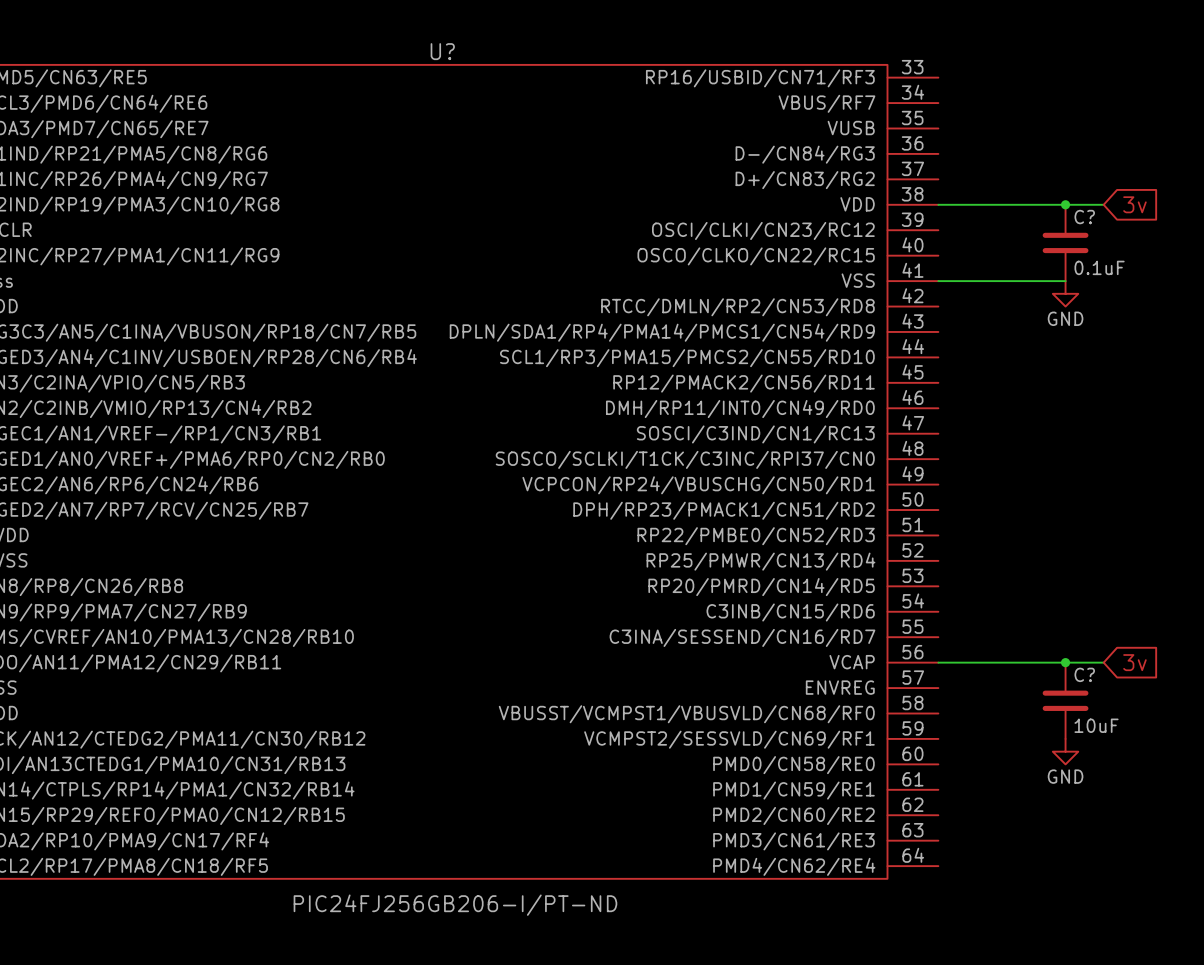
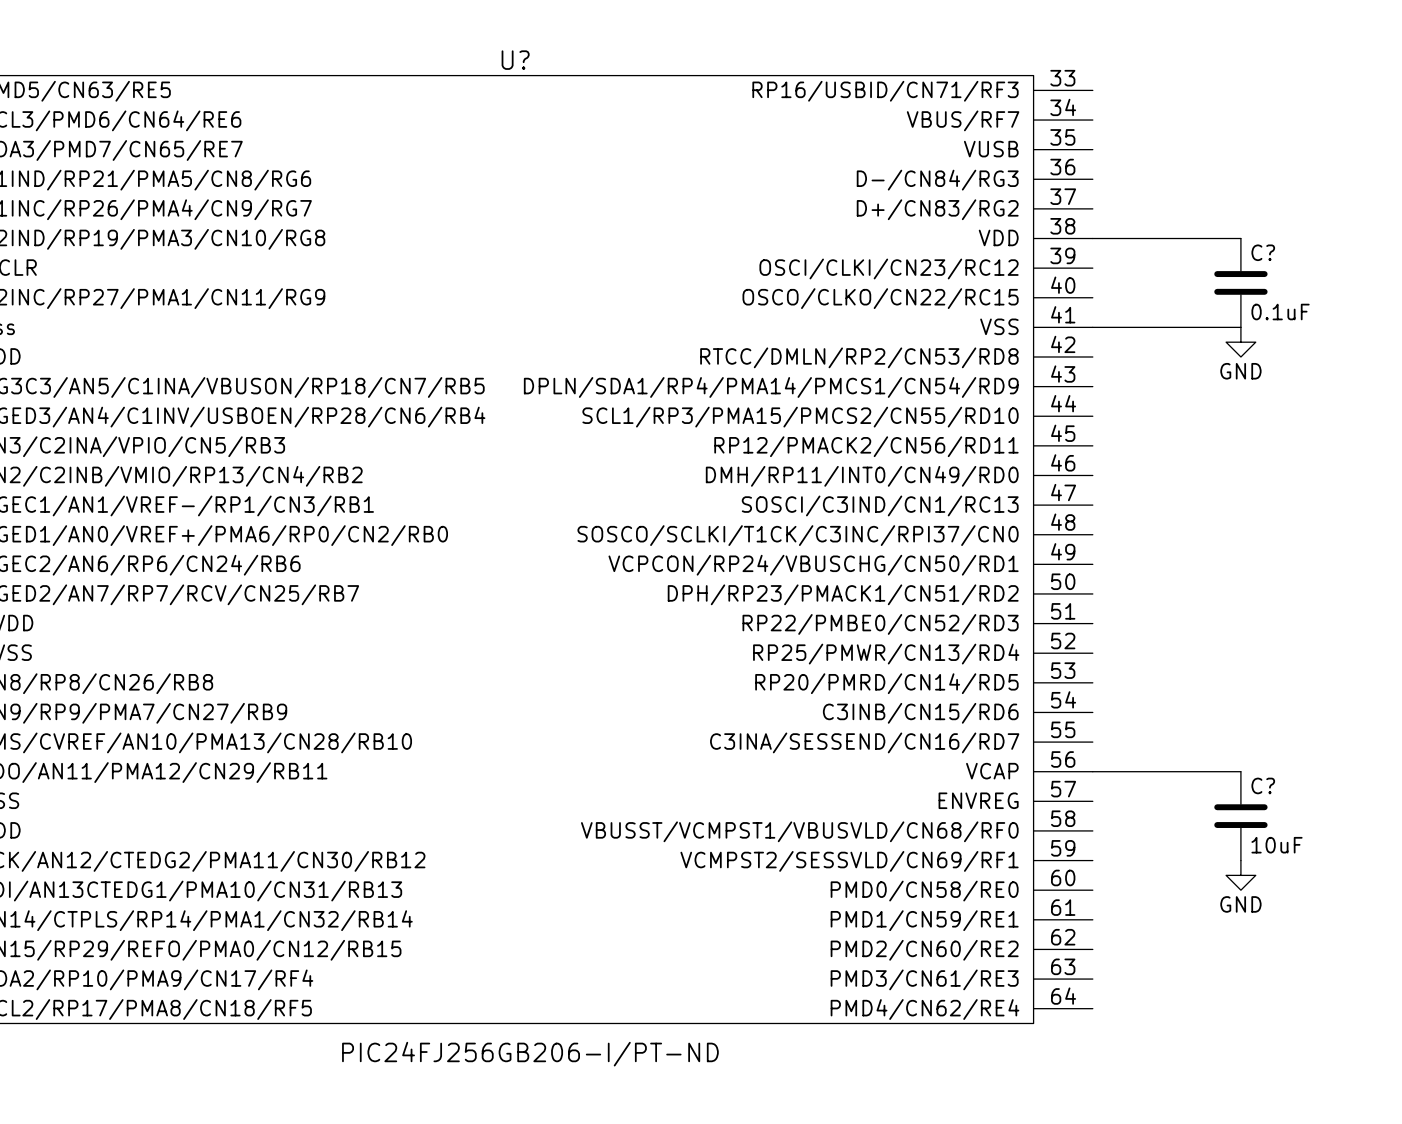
wire: (1065, 204) (1103, 204) -> none
junction: (1065, 204) -> none
global label: 3v (1134, 204) -> none
wire: (1065, 662) (1103, 662) -> none
junction: (1065, 662) -> none
global label: 3v (1134, 662) -> none

